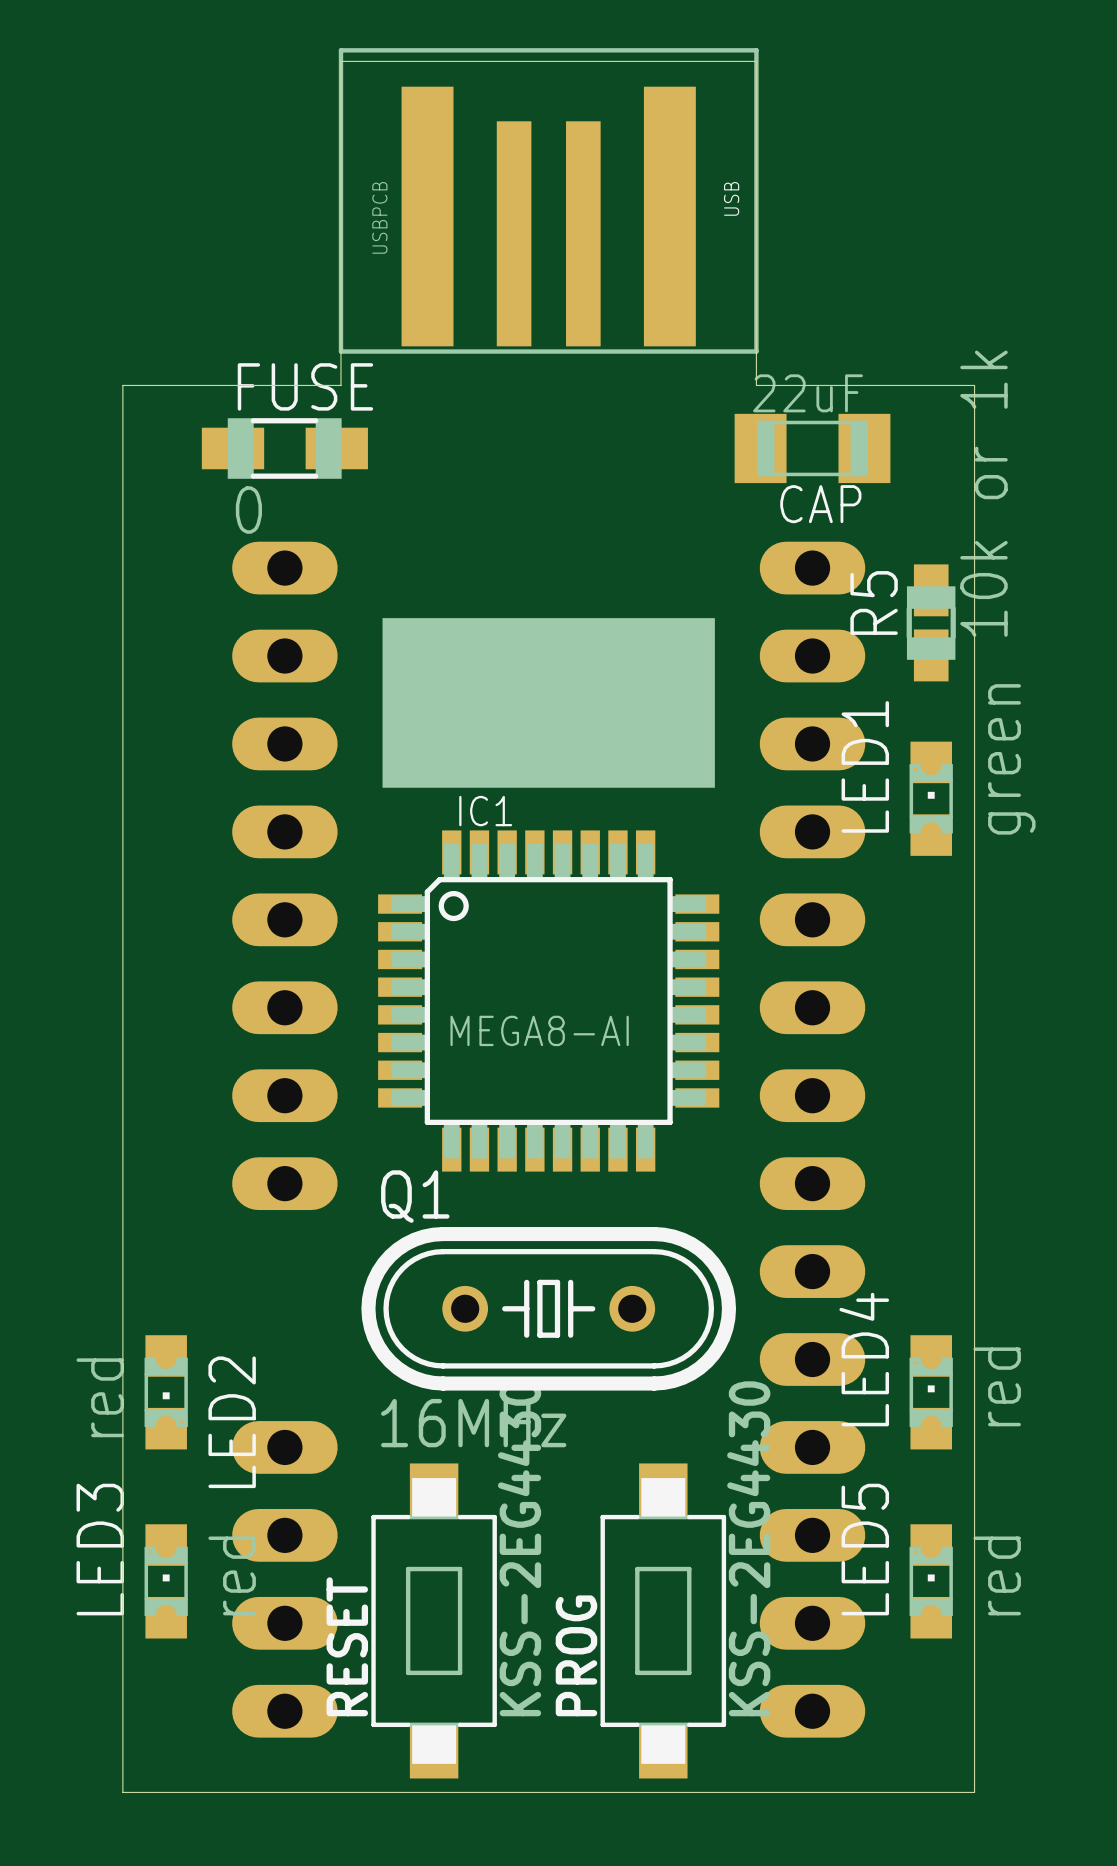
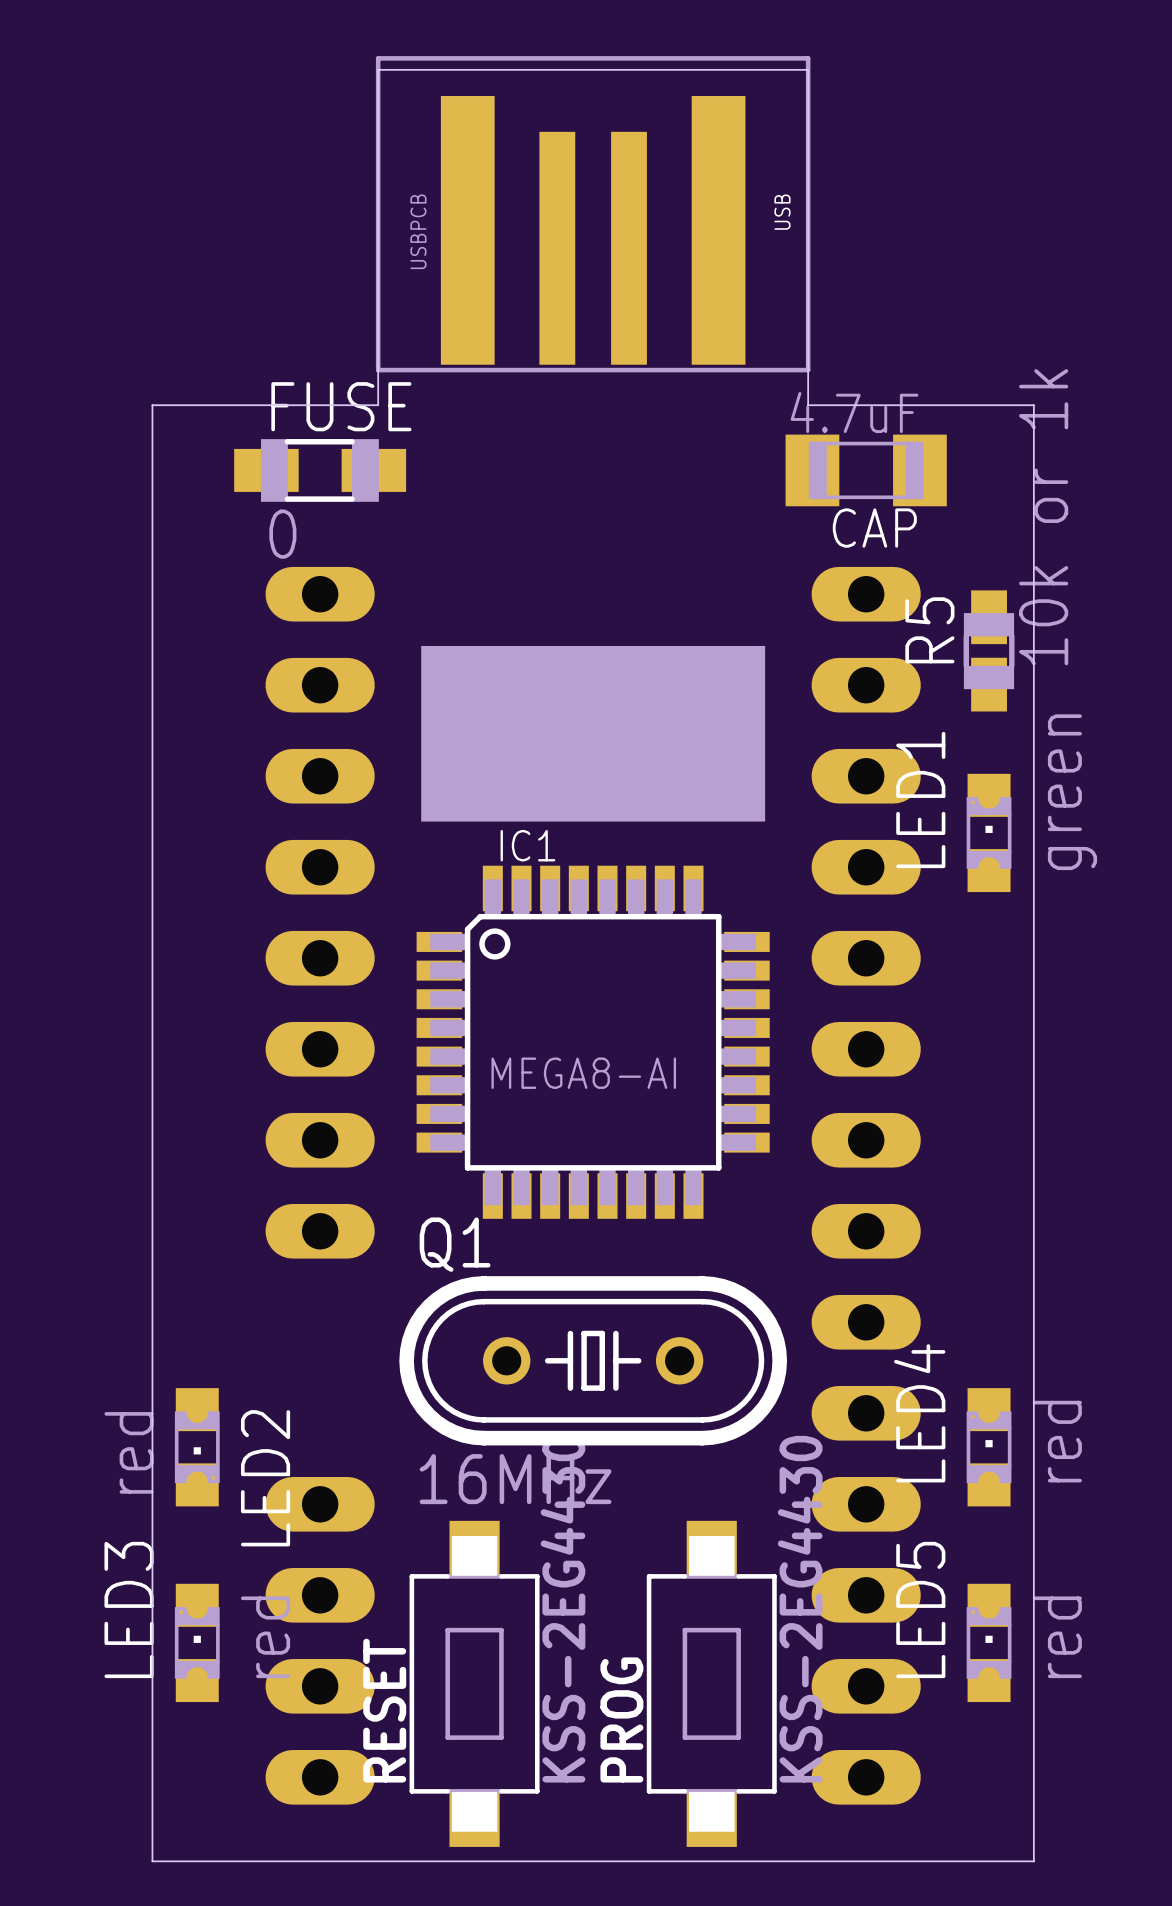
CAP value: 22uF (808, 393) -> 4.7uF (854, 412)

